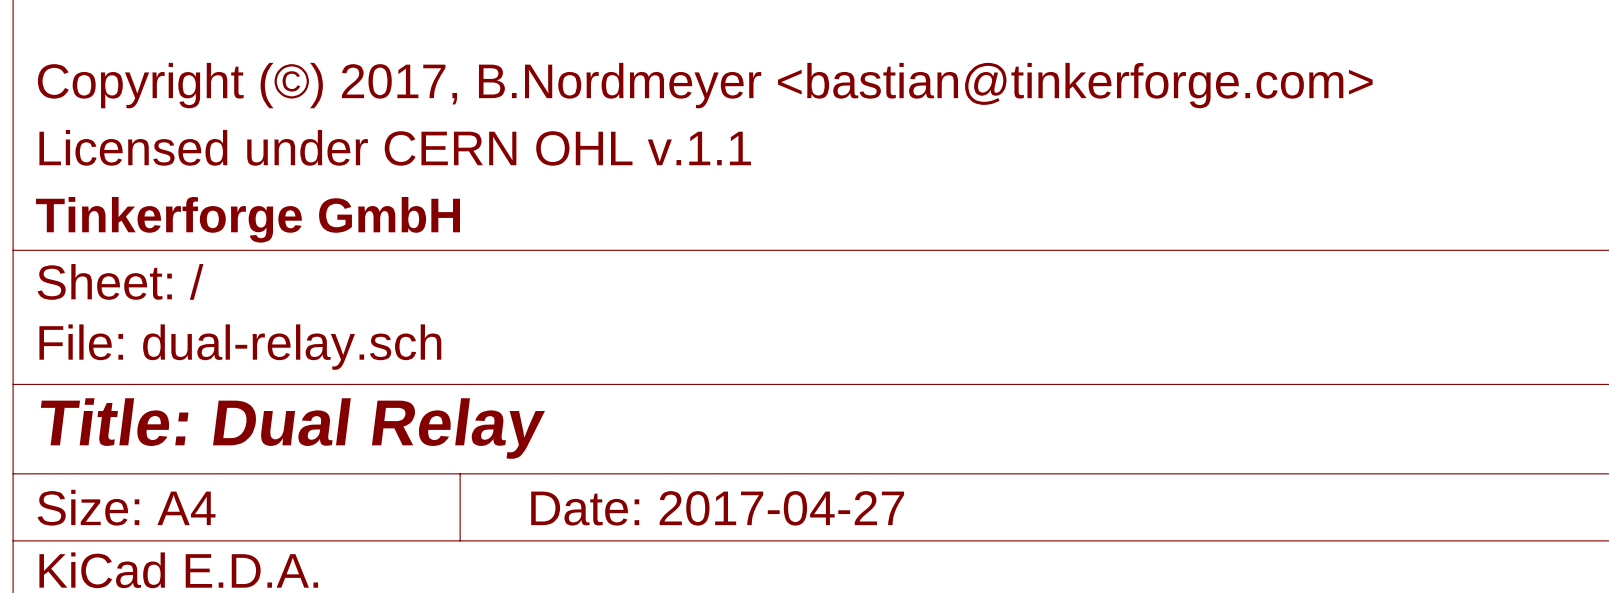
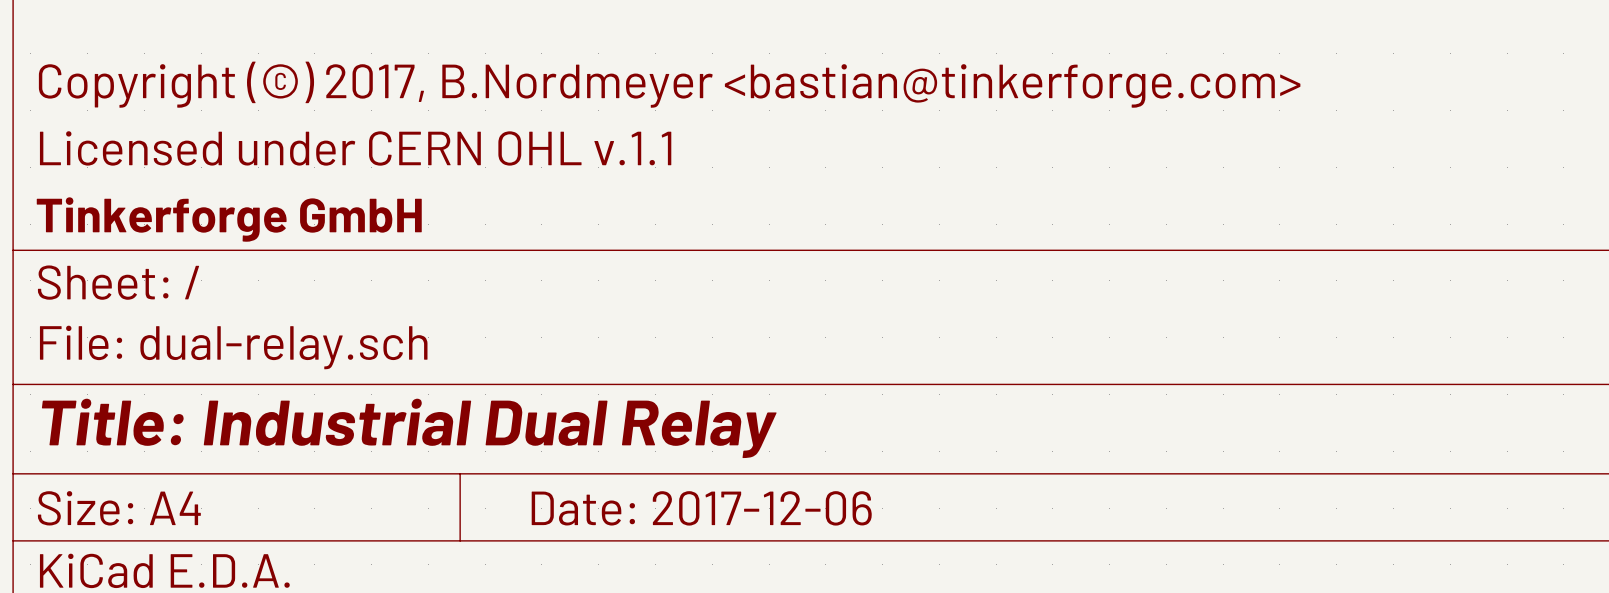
title block: Title: Dual Relay (292, 428) -> Title: Industrial Dual Relay (409, 428)
title block: Date: 2017-04-27 (717, 508) -> Date: 2017-12-06 (701, 508)

